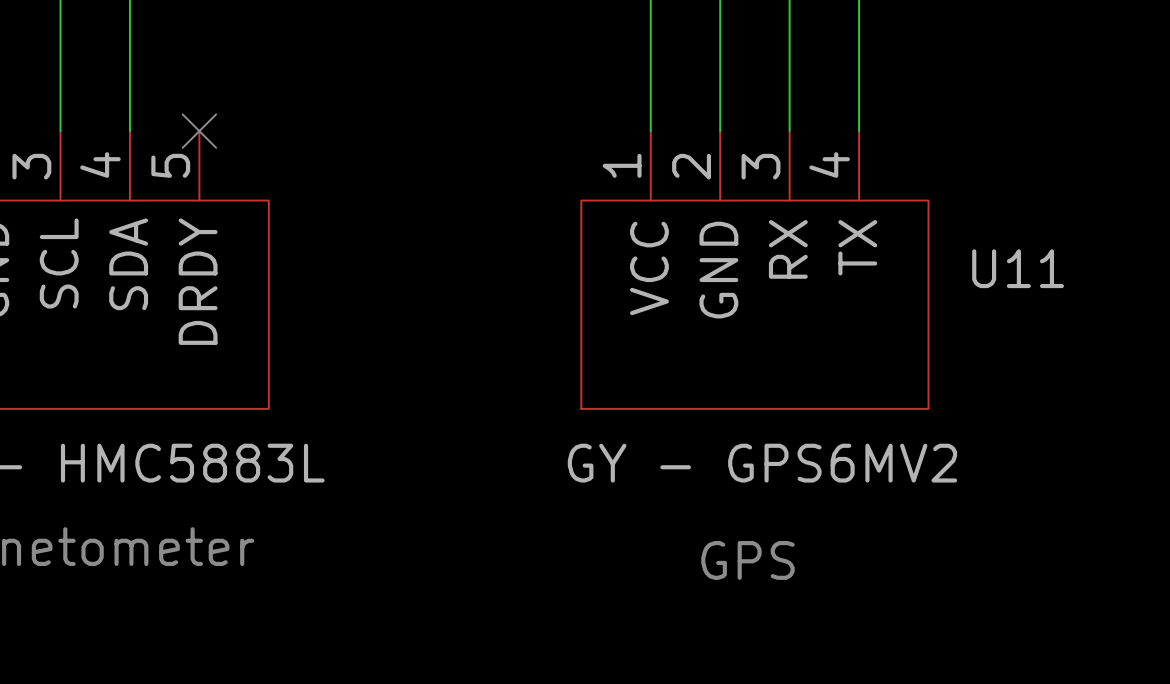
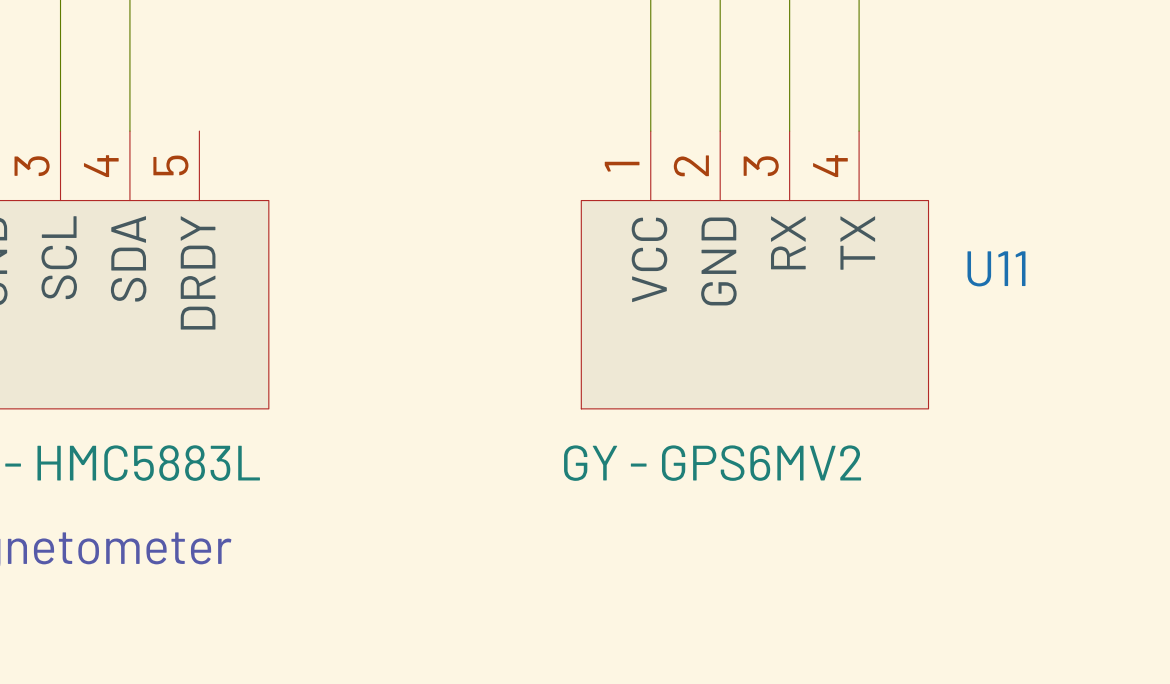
no-connect mark: (199, 131) -> none
text: GPS (747, 560) -> none

